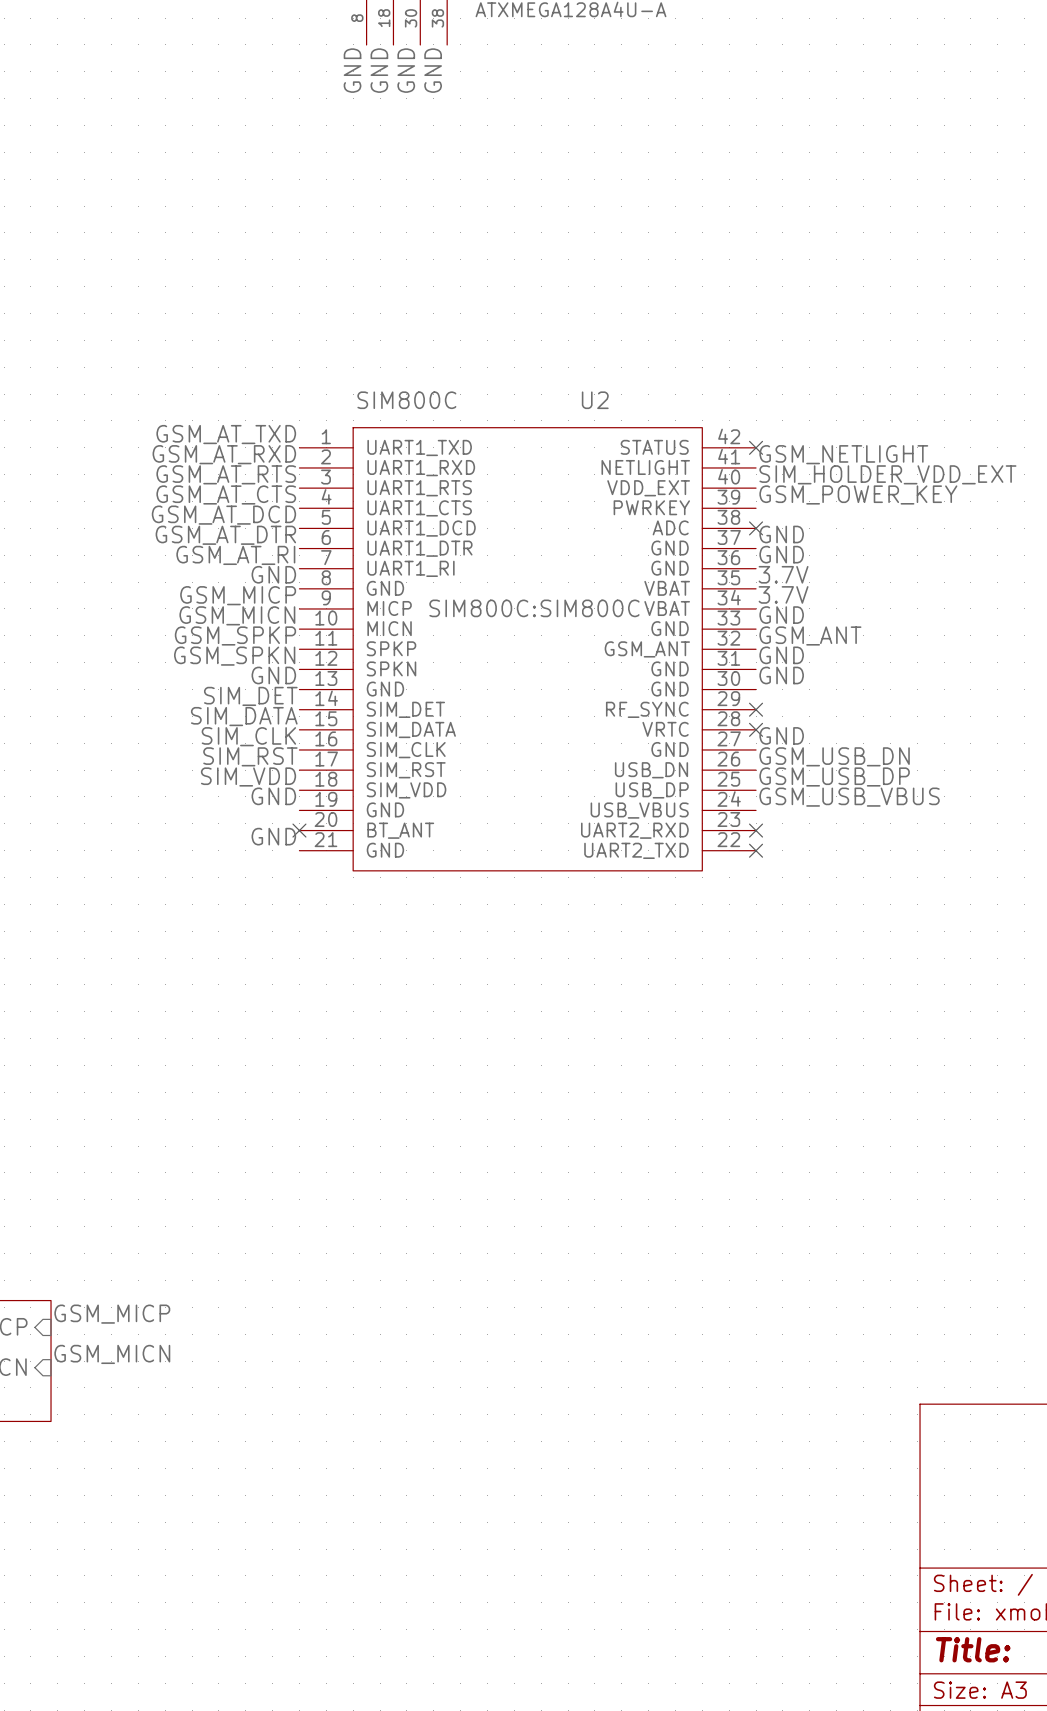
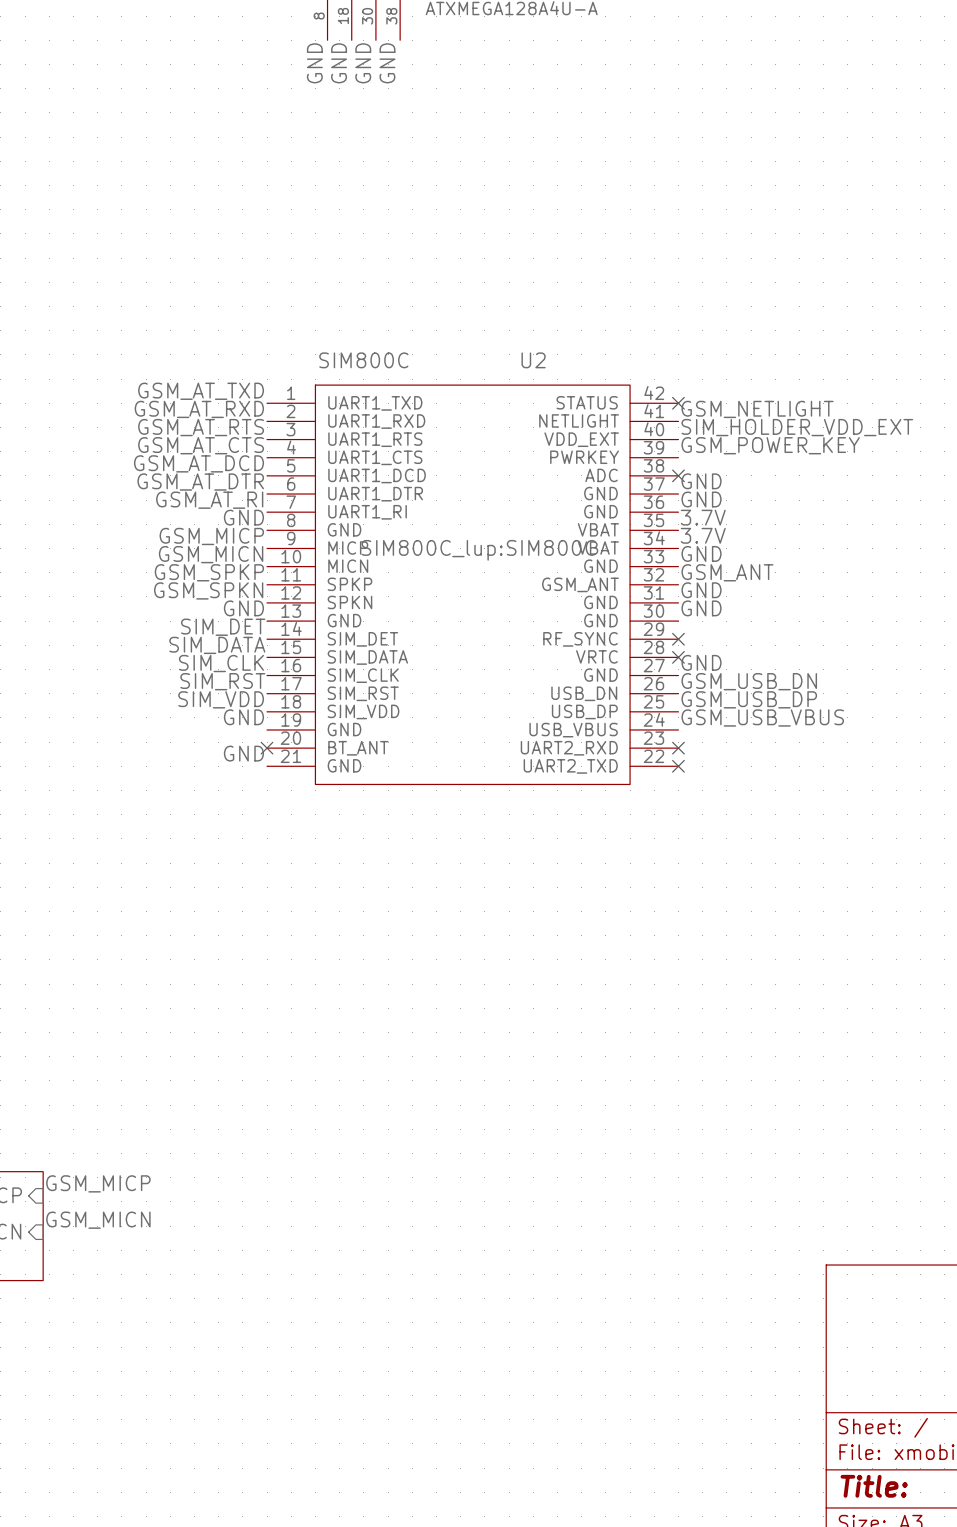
U2 text: SIM800C:SIM800C (534, 608) -> SIM800C_lup:SIM800C (478, 550)

